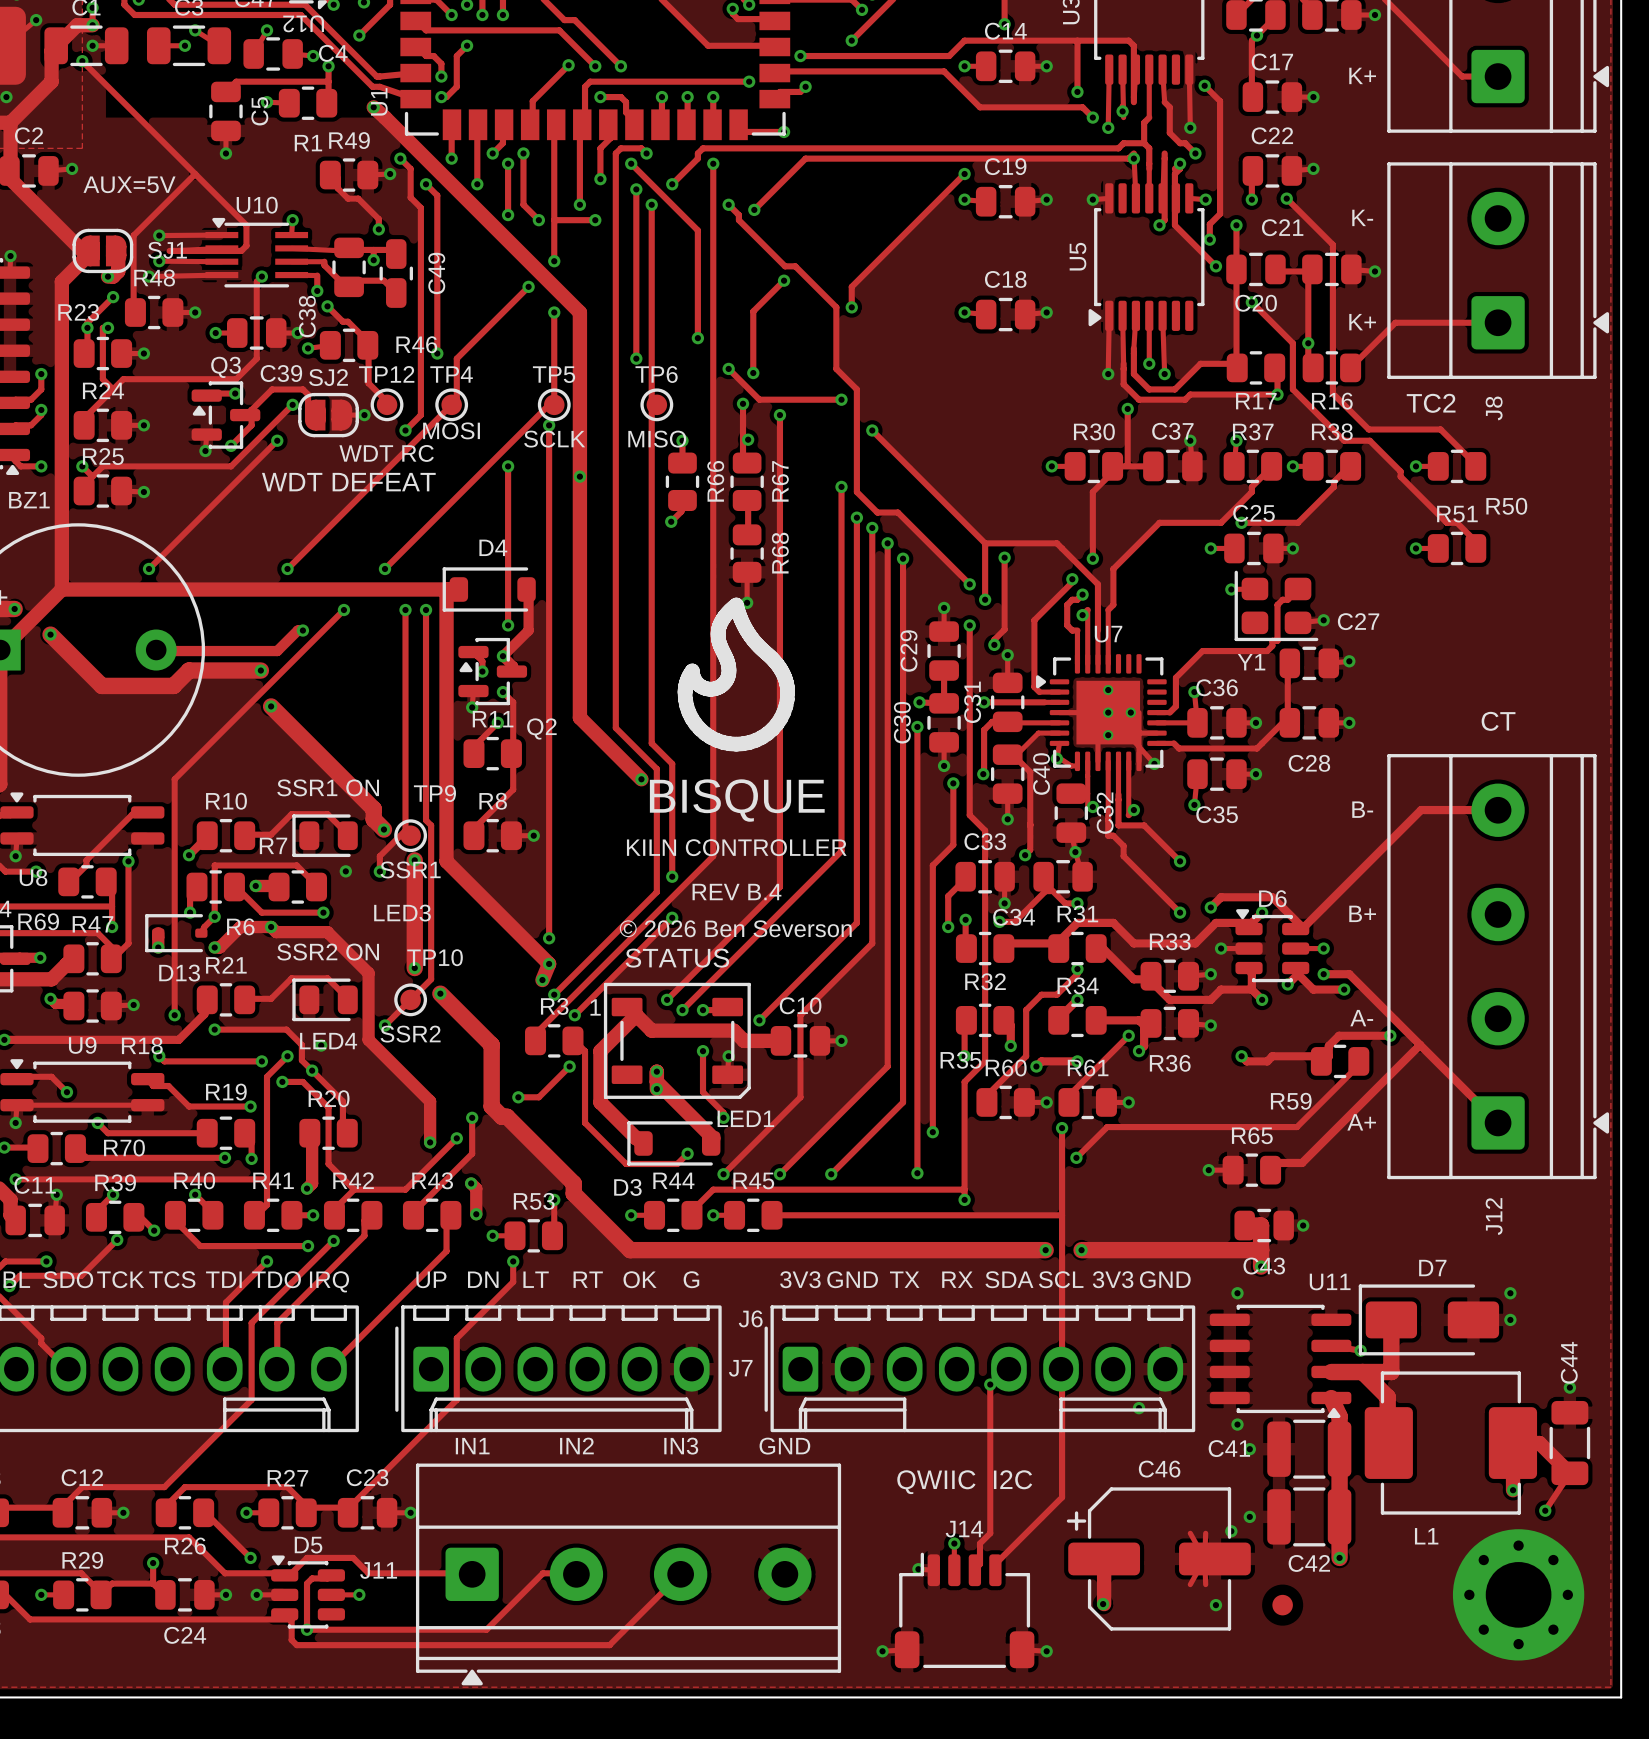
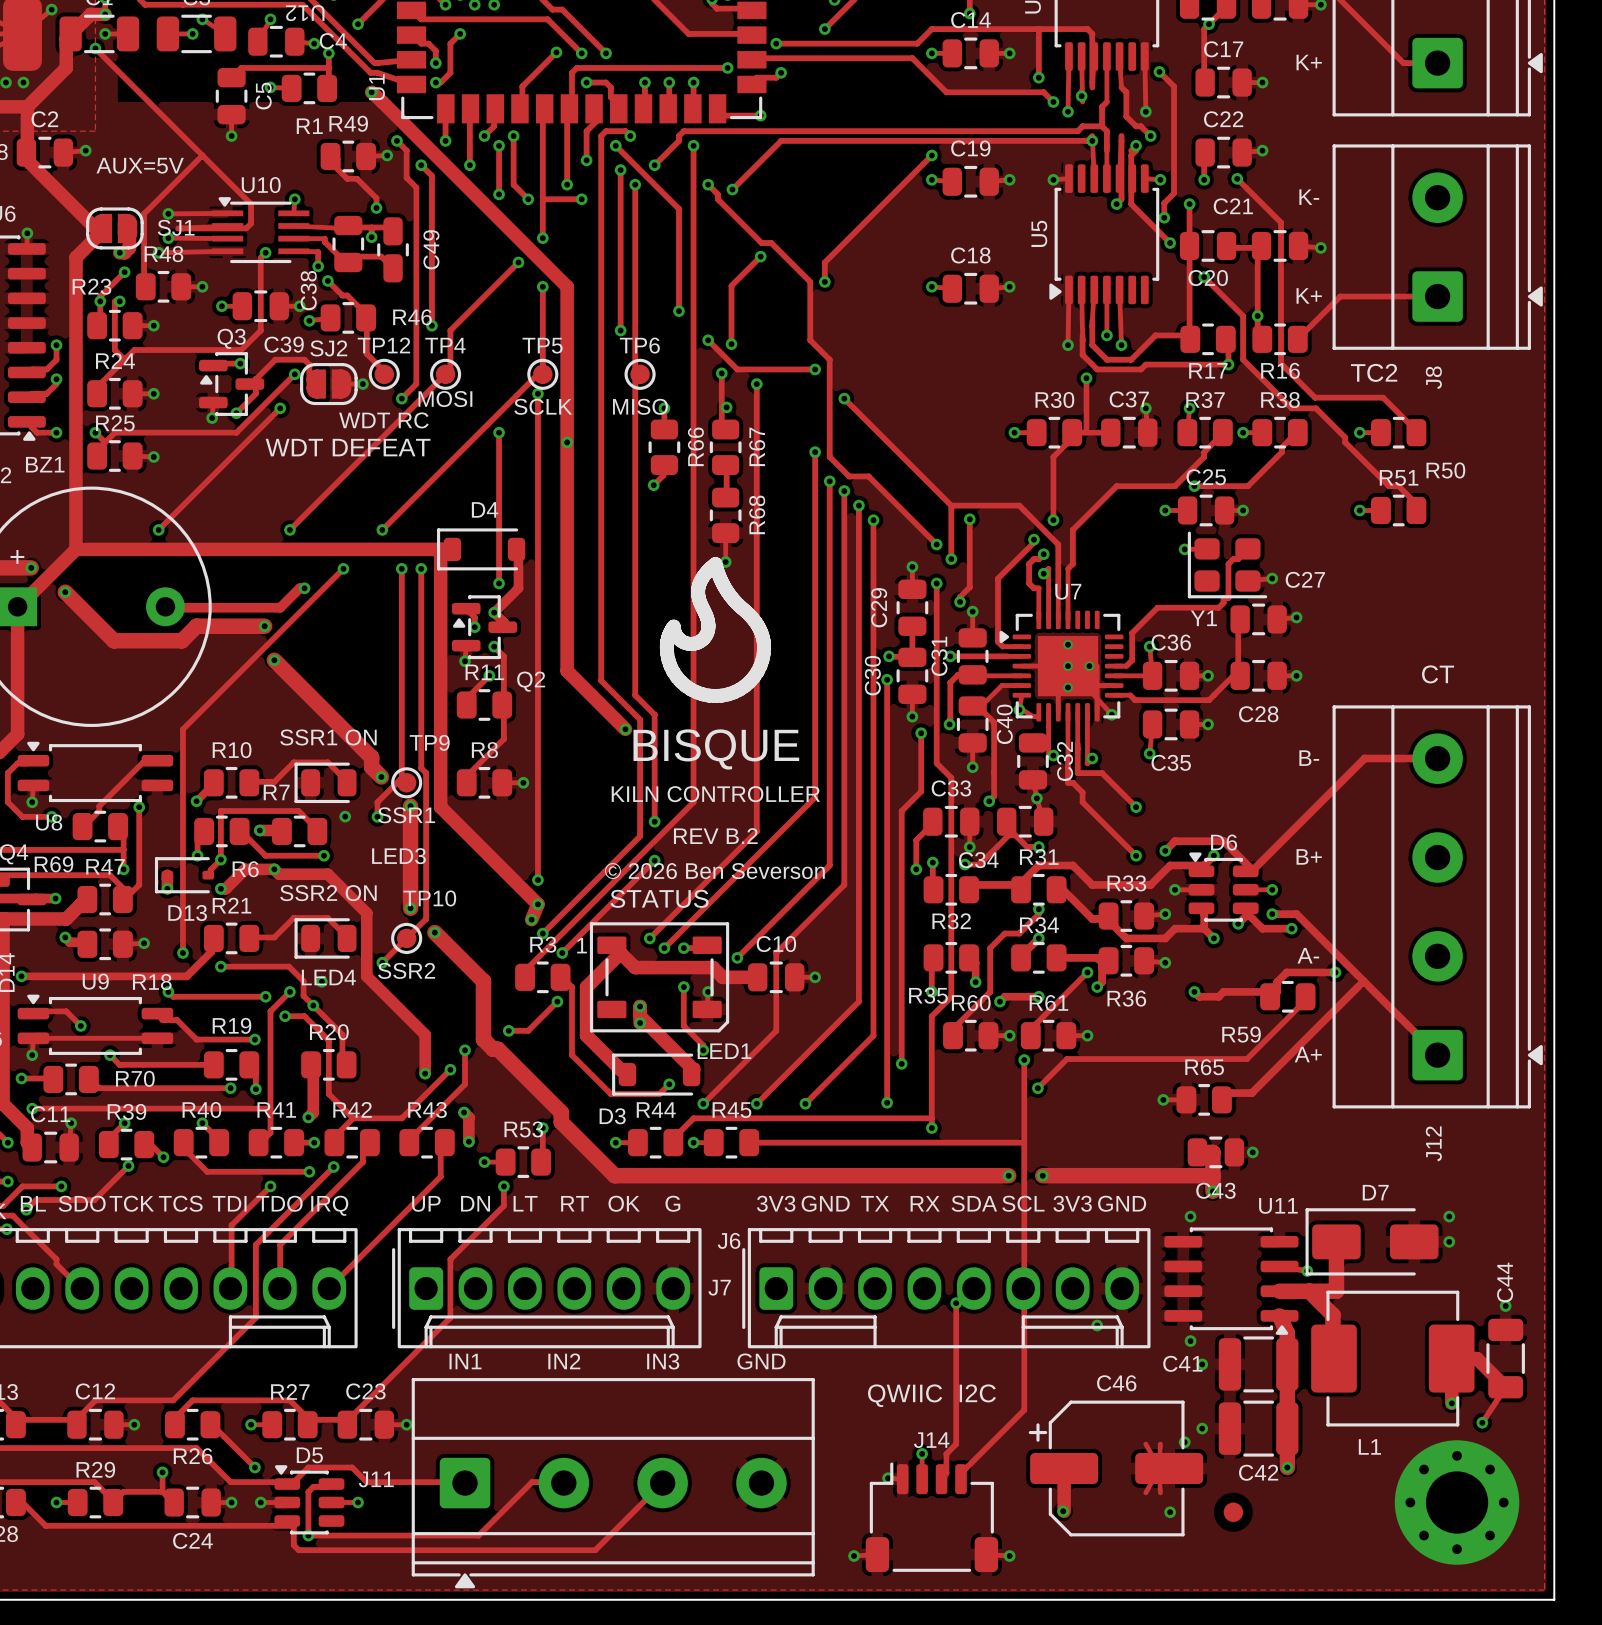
text: REV B.4 (736, 892) -> REV B.2 (715, 836)

